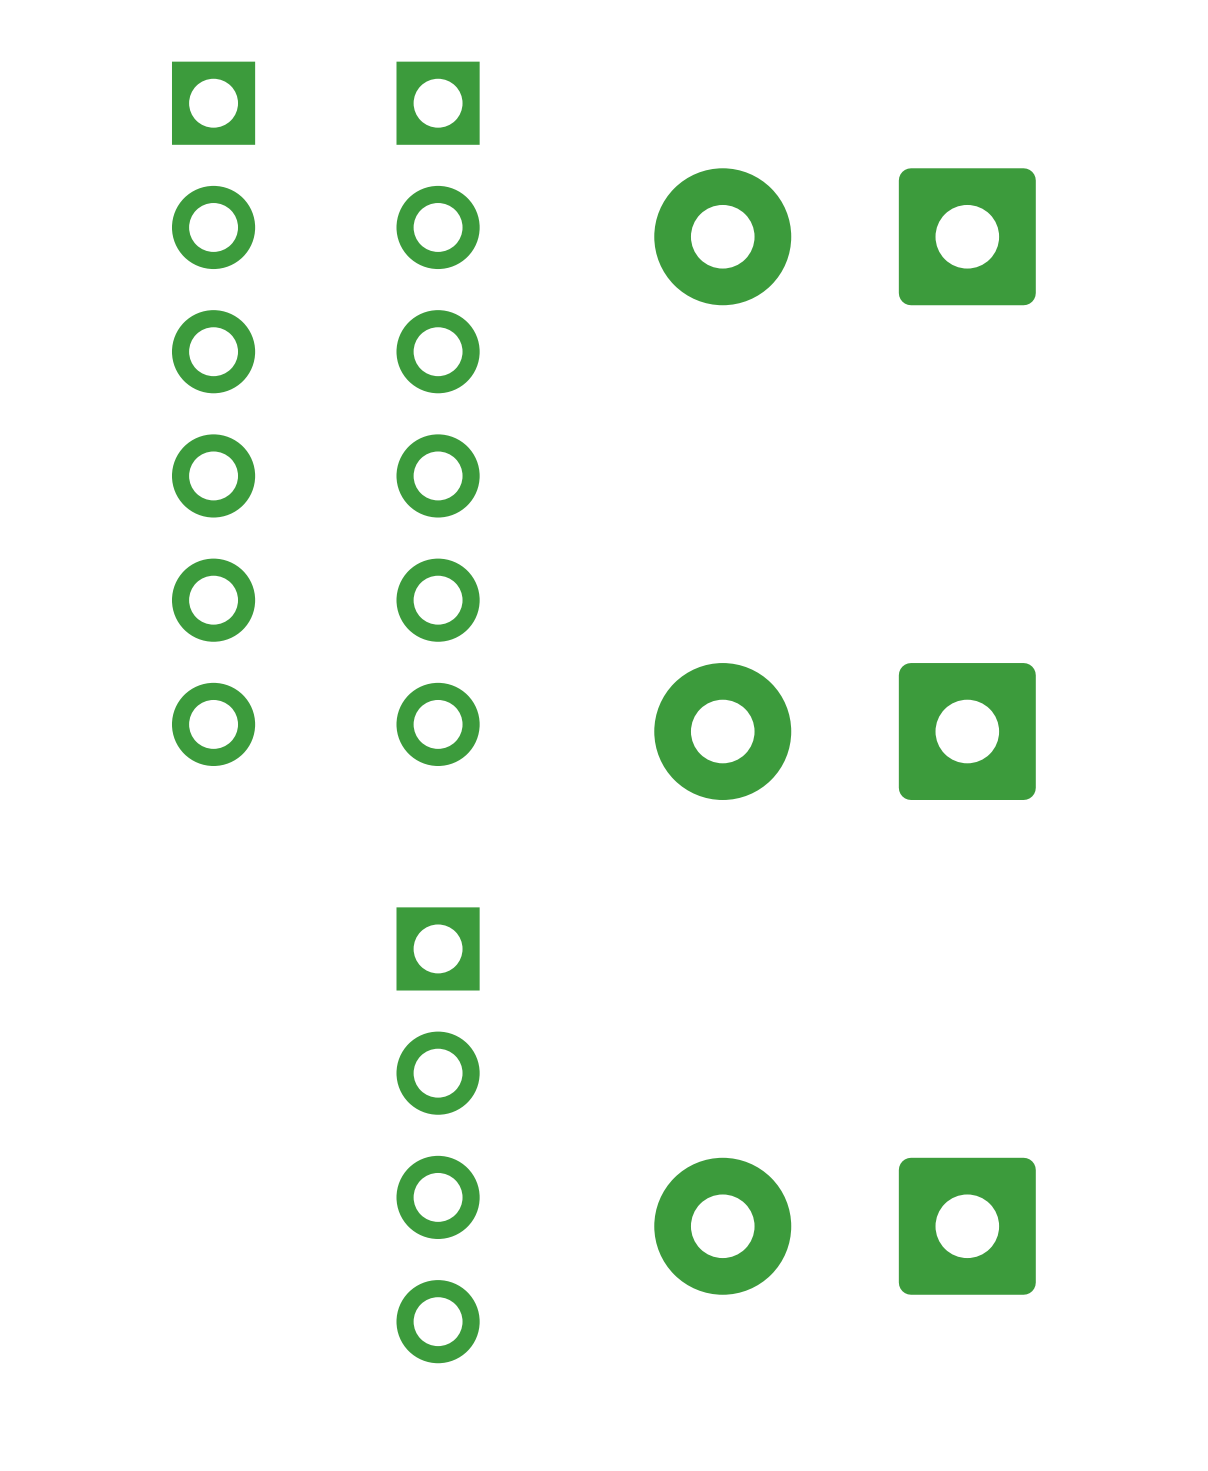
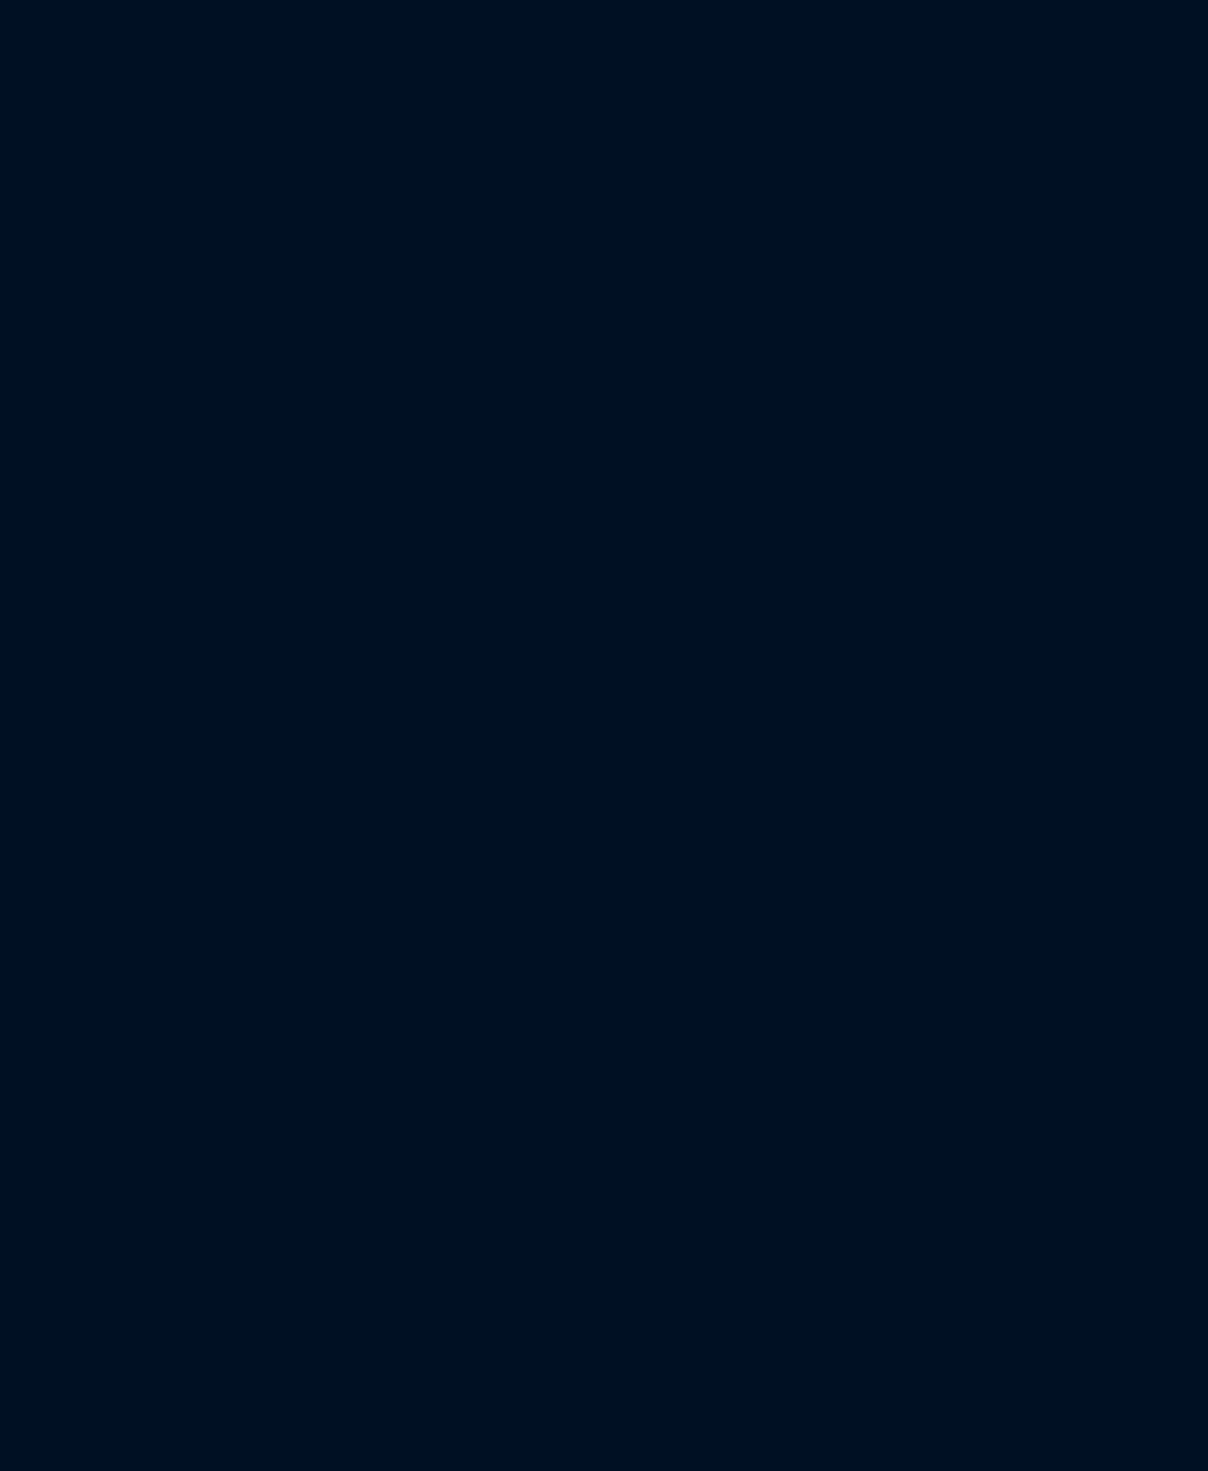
part: (845, 236) -> none
part: (213, 413) -> none
part: (438, 413) -> none
part: (845, 731) -> none
part: (438, 1135) -> none
part: (845, 1226) -> none

